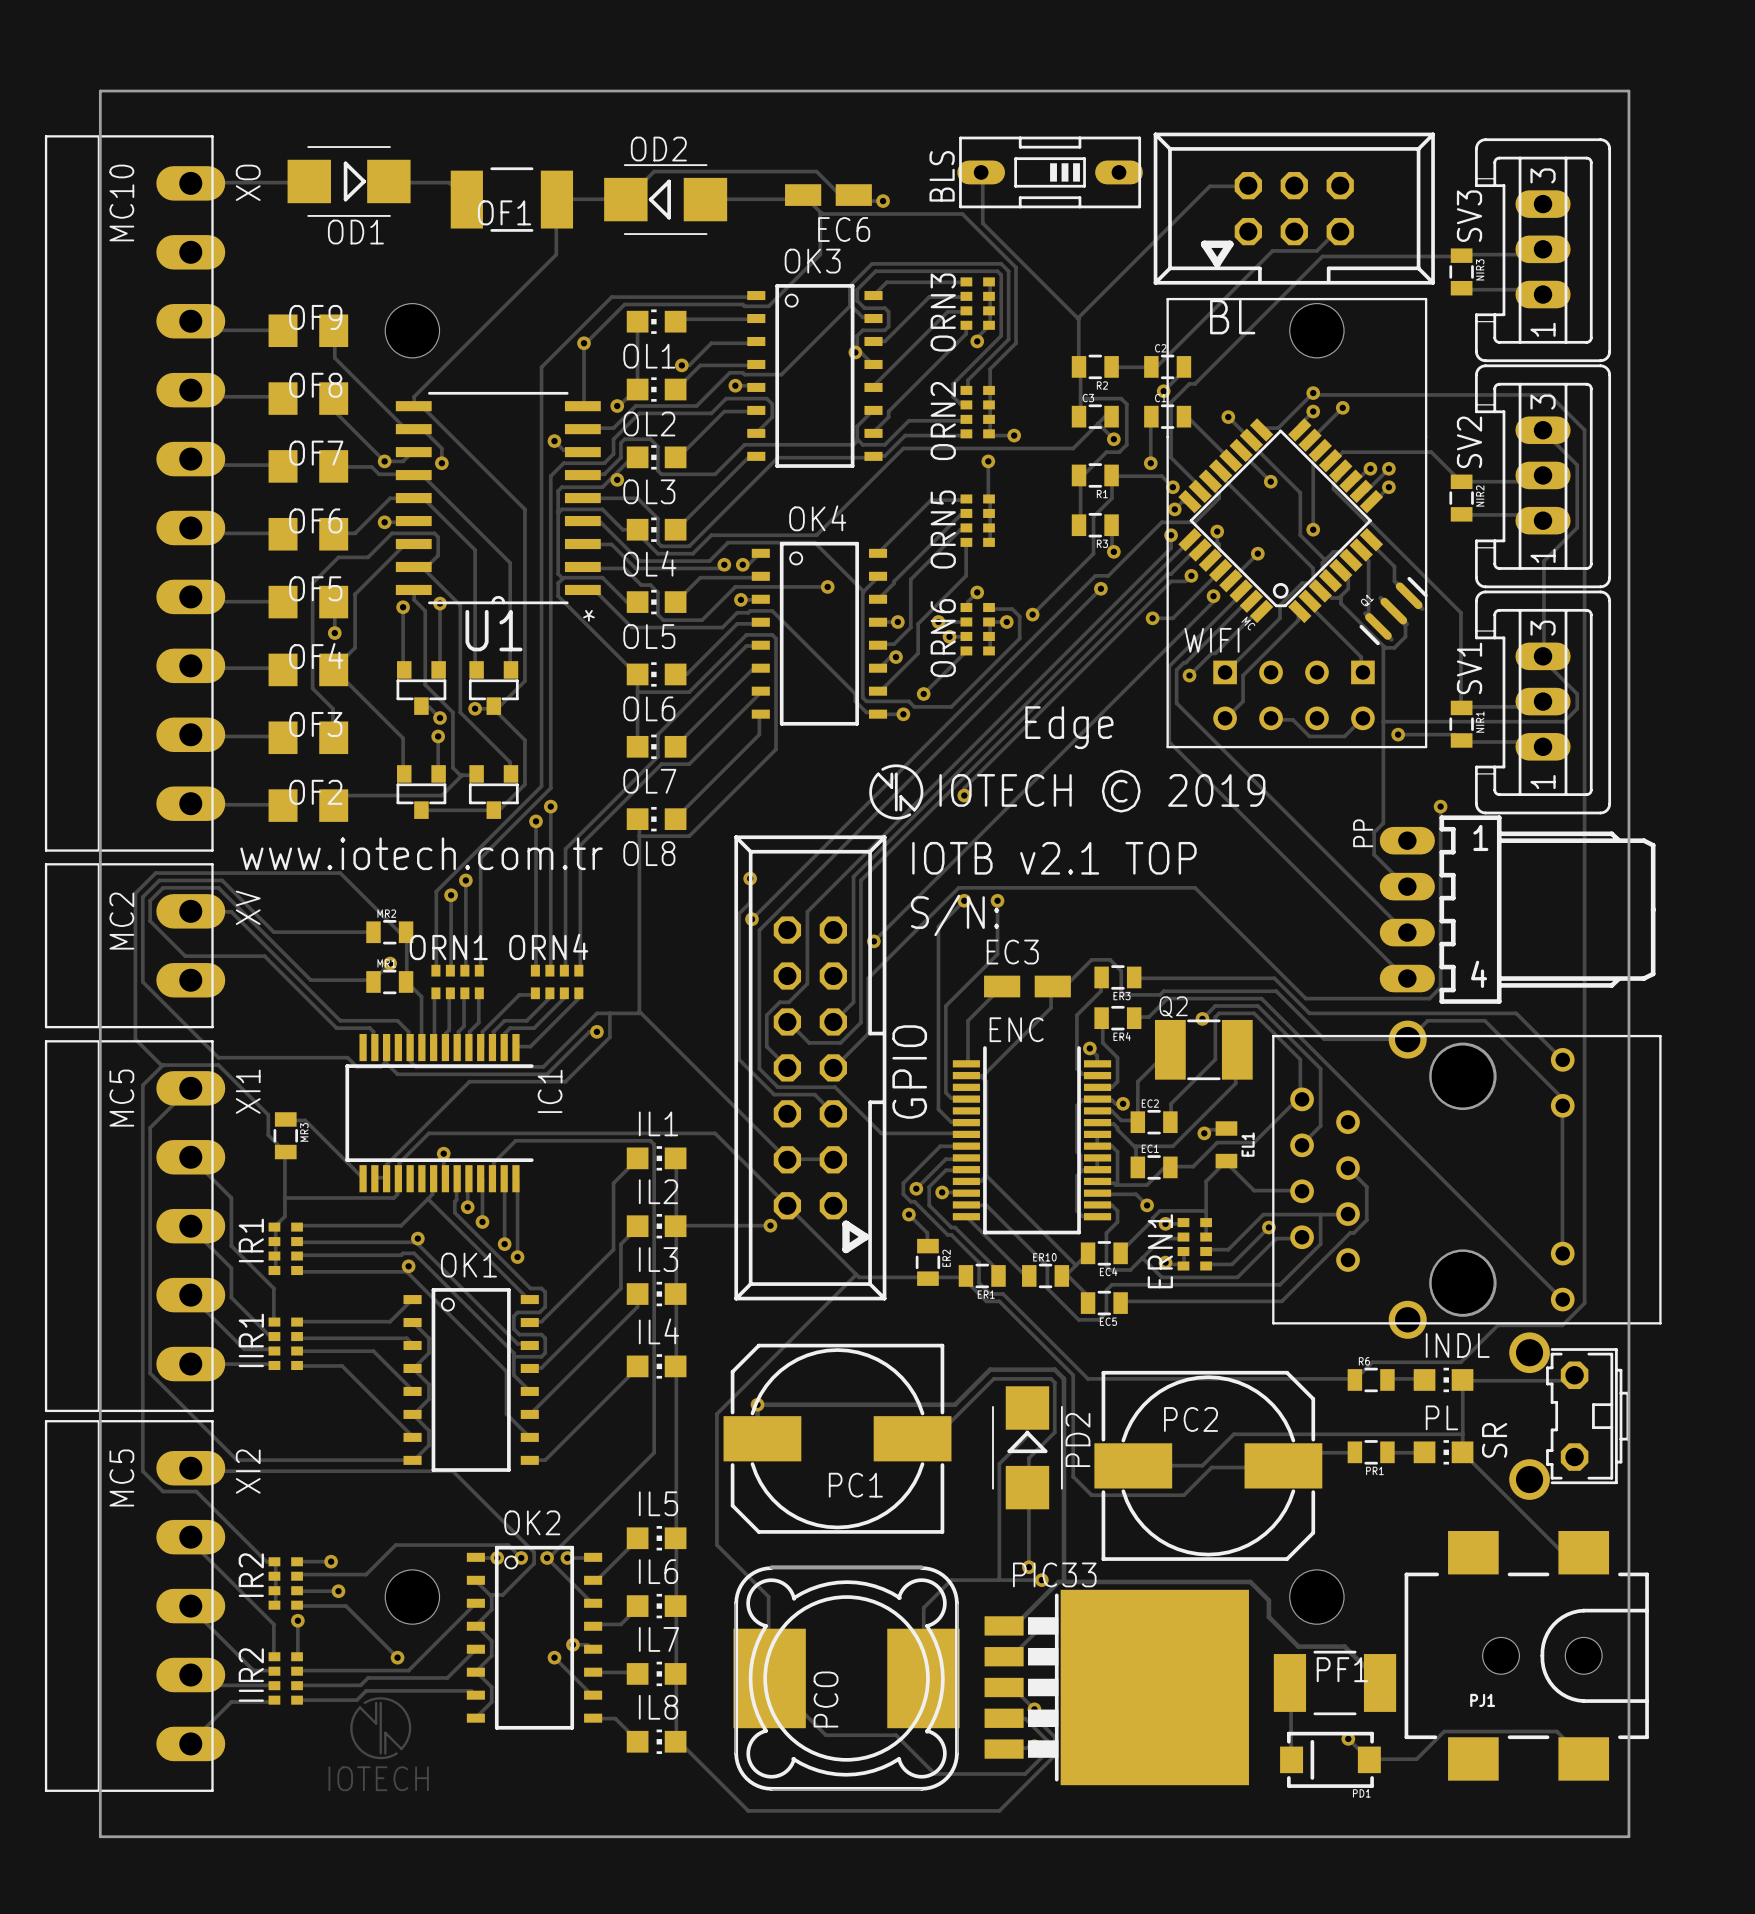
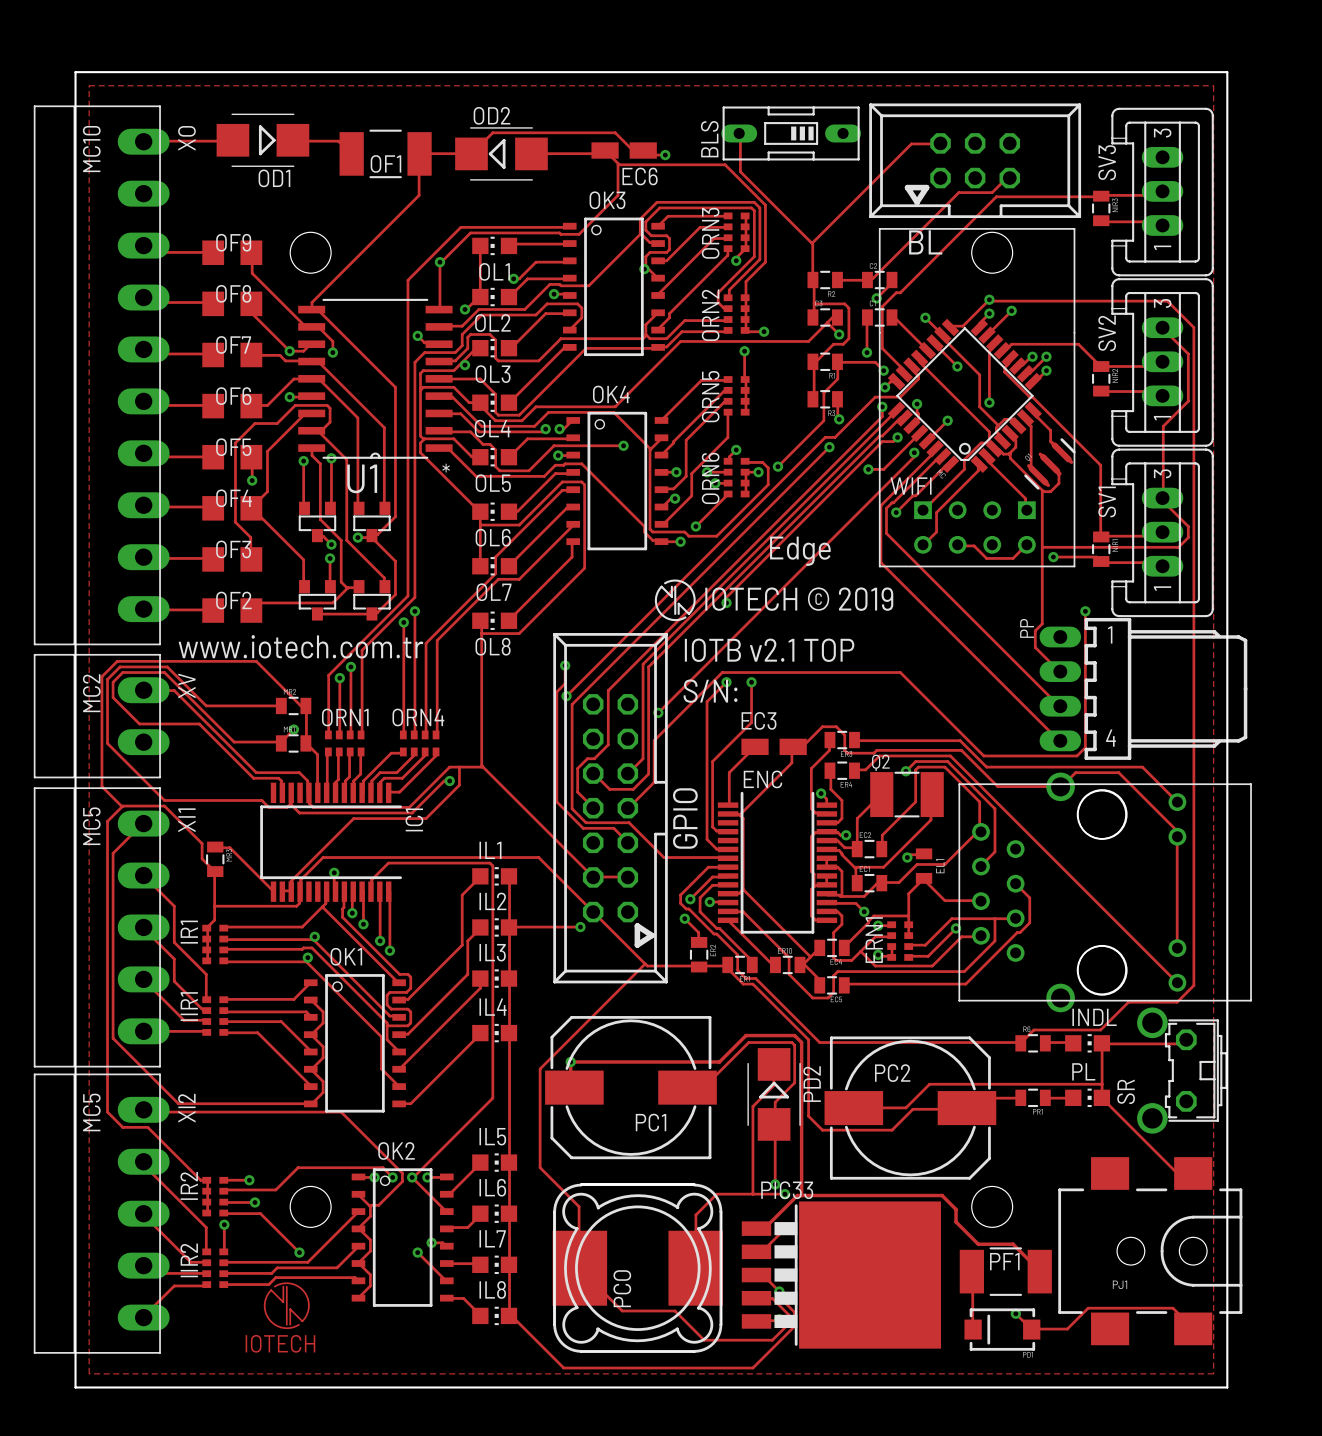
zone outline: none -> (89, 85) (1213, 85) (1213, 1373) (89, 1373) (89, 85)

